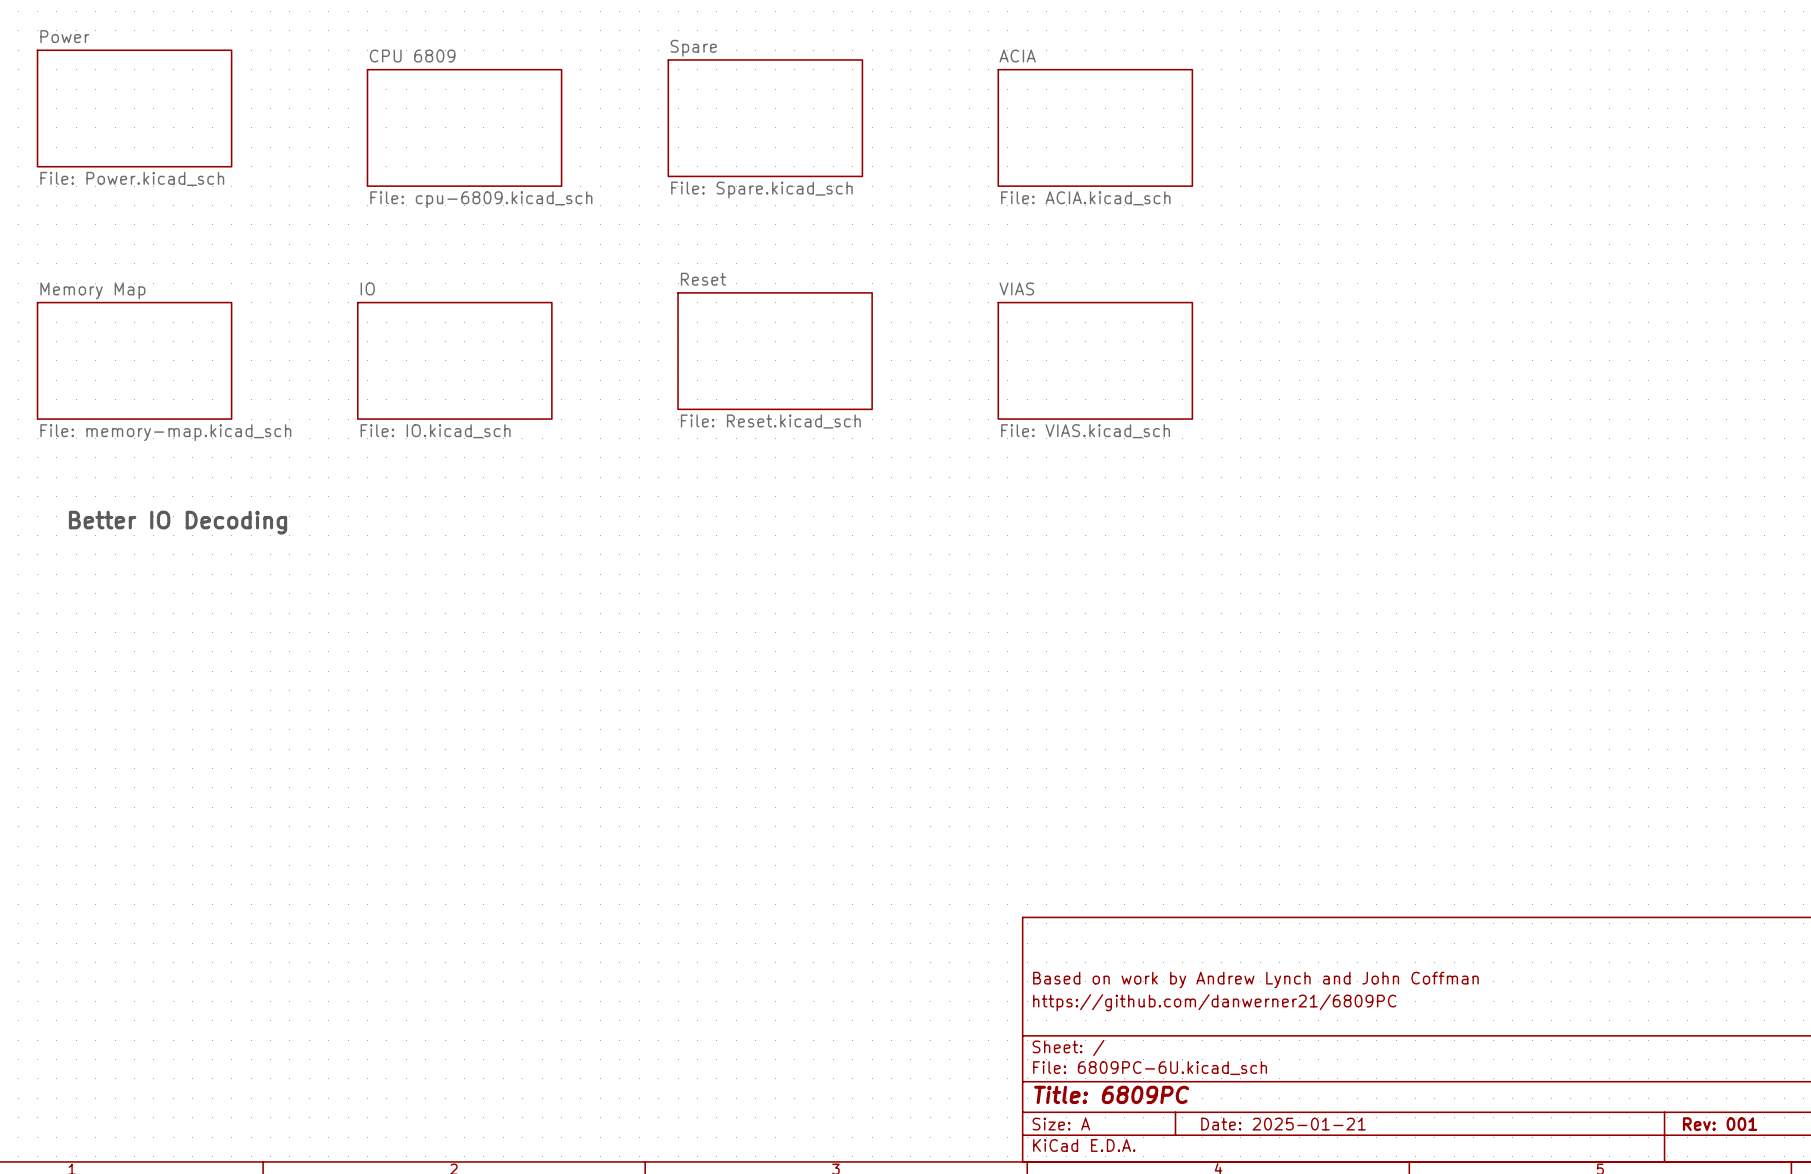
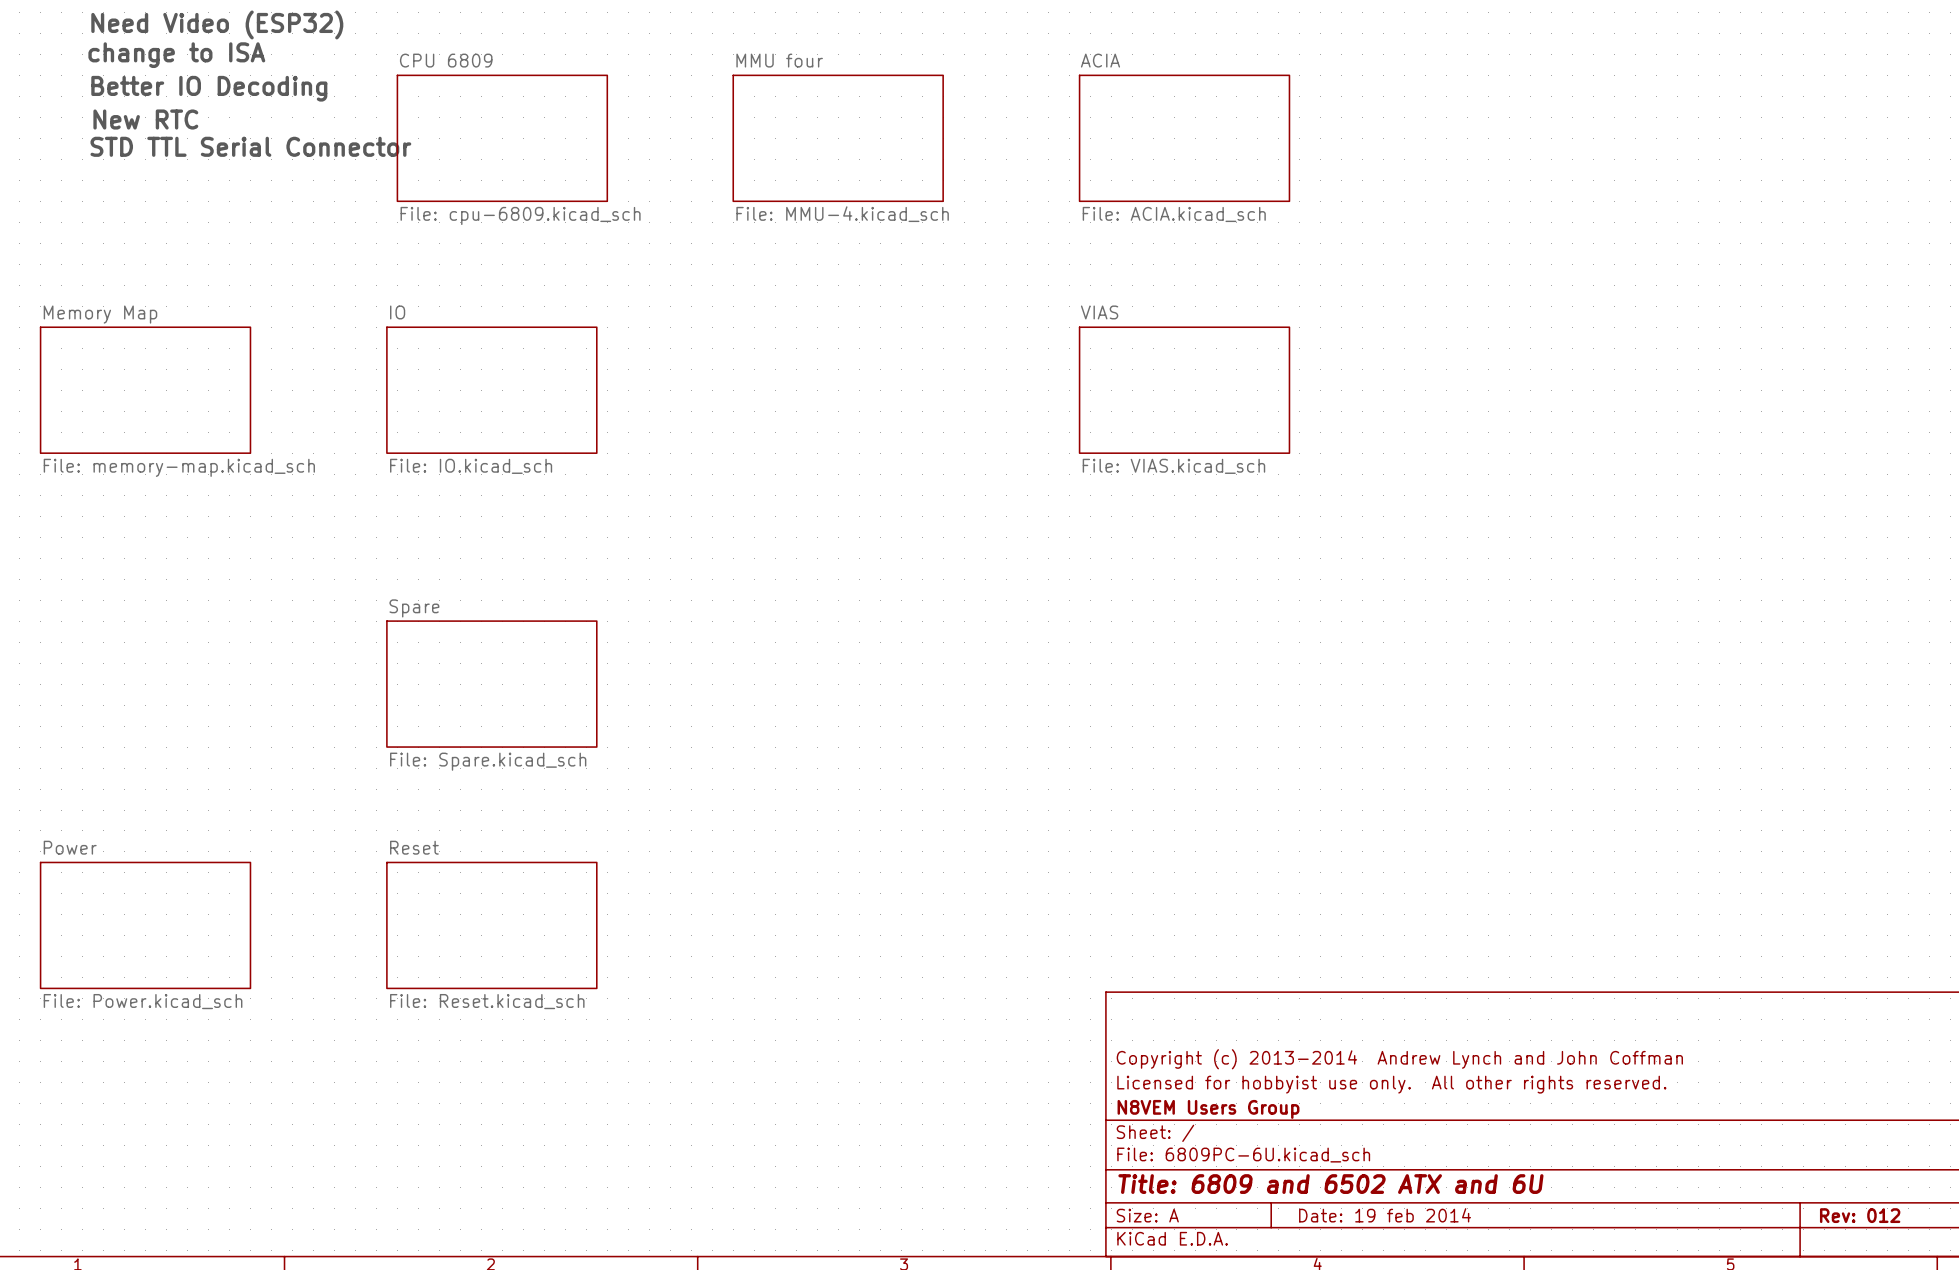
text: none -> Need Video (ESP32) (217, 24)
text: none -> change to ISA (176, 55)
text: none -> Better IO Decoding (209, 88)
sheet Power: File: Power.kicad_sch (134, 108) -> none
text: none -> New RTC (145, 119)
sheet Spare: File: Spare.kicad_sch (765, 118) -> none
sheet MMU four: none -> File: MMU-4.kicad_sch (838, 138)
text: none -> STD TTL Serial Connector (250, 146)
sheet Reset: File: Reset.kicad_sch (775, 351) -> none
text: Better IO Decoding (178, 522) -> none
sheet Spare: none -> File: Spare.kicad_sch (491, 684)
sheet Power: none -> File: Power.kicad_sch (145, 925)
sheet Reset: none -> File: Reset.kicad_sch (491, 925)
title block: Based on work by Andrew Lynch and John Coffman (1255, 980) -> Copyright (c) 2013-2014 Andrew Lynch and John Coffman (1399, 1059)
title block: https://github.com/danwerner21/6809PC (1214, 1002) -> Licensed for hobbyist use only. All other rights reserved. (1391, 1084)
title block: none -> N8VEM Users Group (1208, 1109)
title block: Title: 6809PC (1111, 1094) -> Title: 6809 and 6502 ATX and 6U (1330, 1184)
title block: Date: 2025-01-21 (1283, 1124) -> Date: 19 feb 2014 (1385, 1215)
title block: Rev: 001 (1720, 1124) -> Rev: 012 (1860, 1215)

